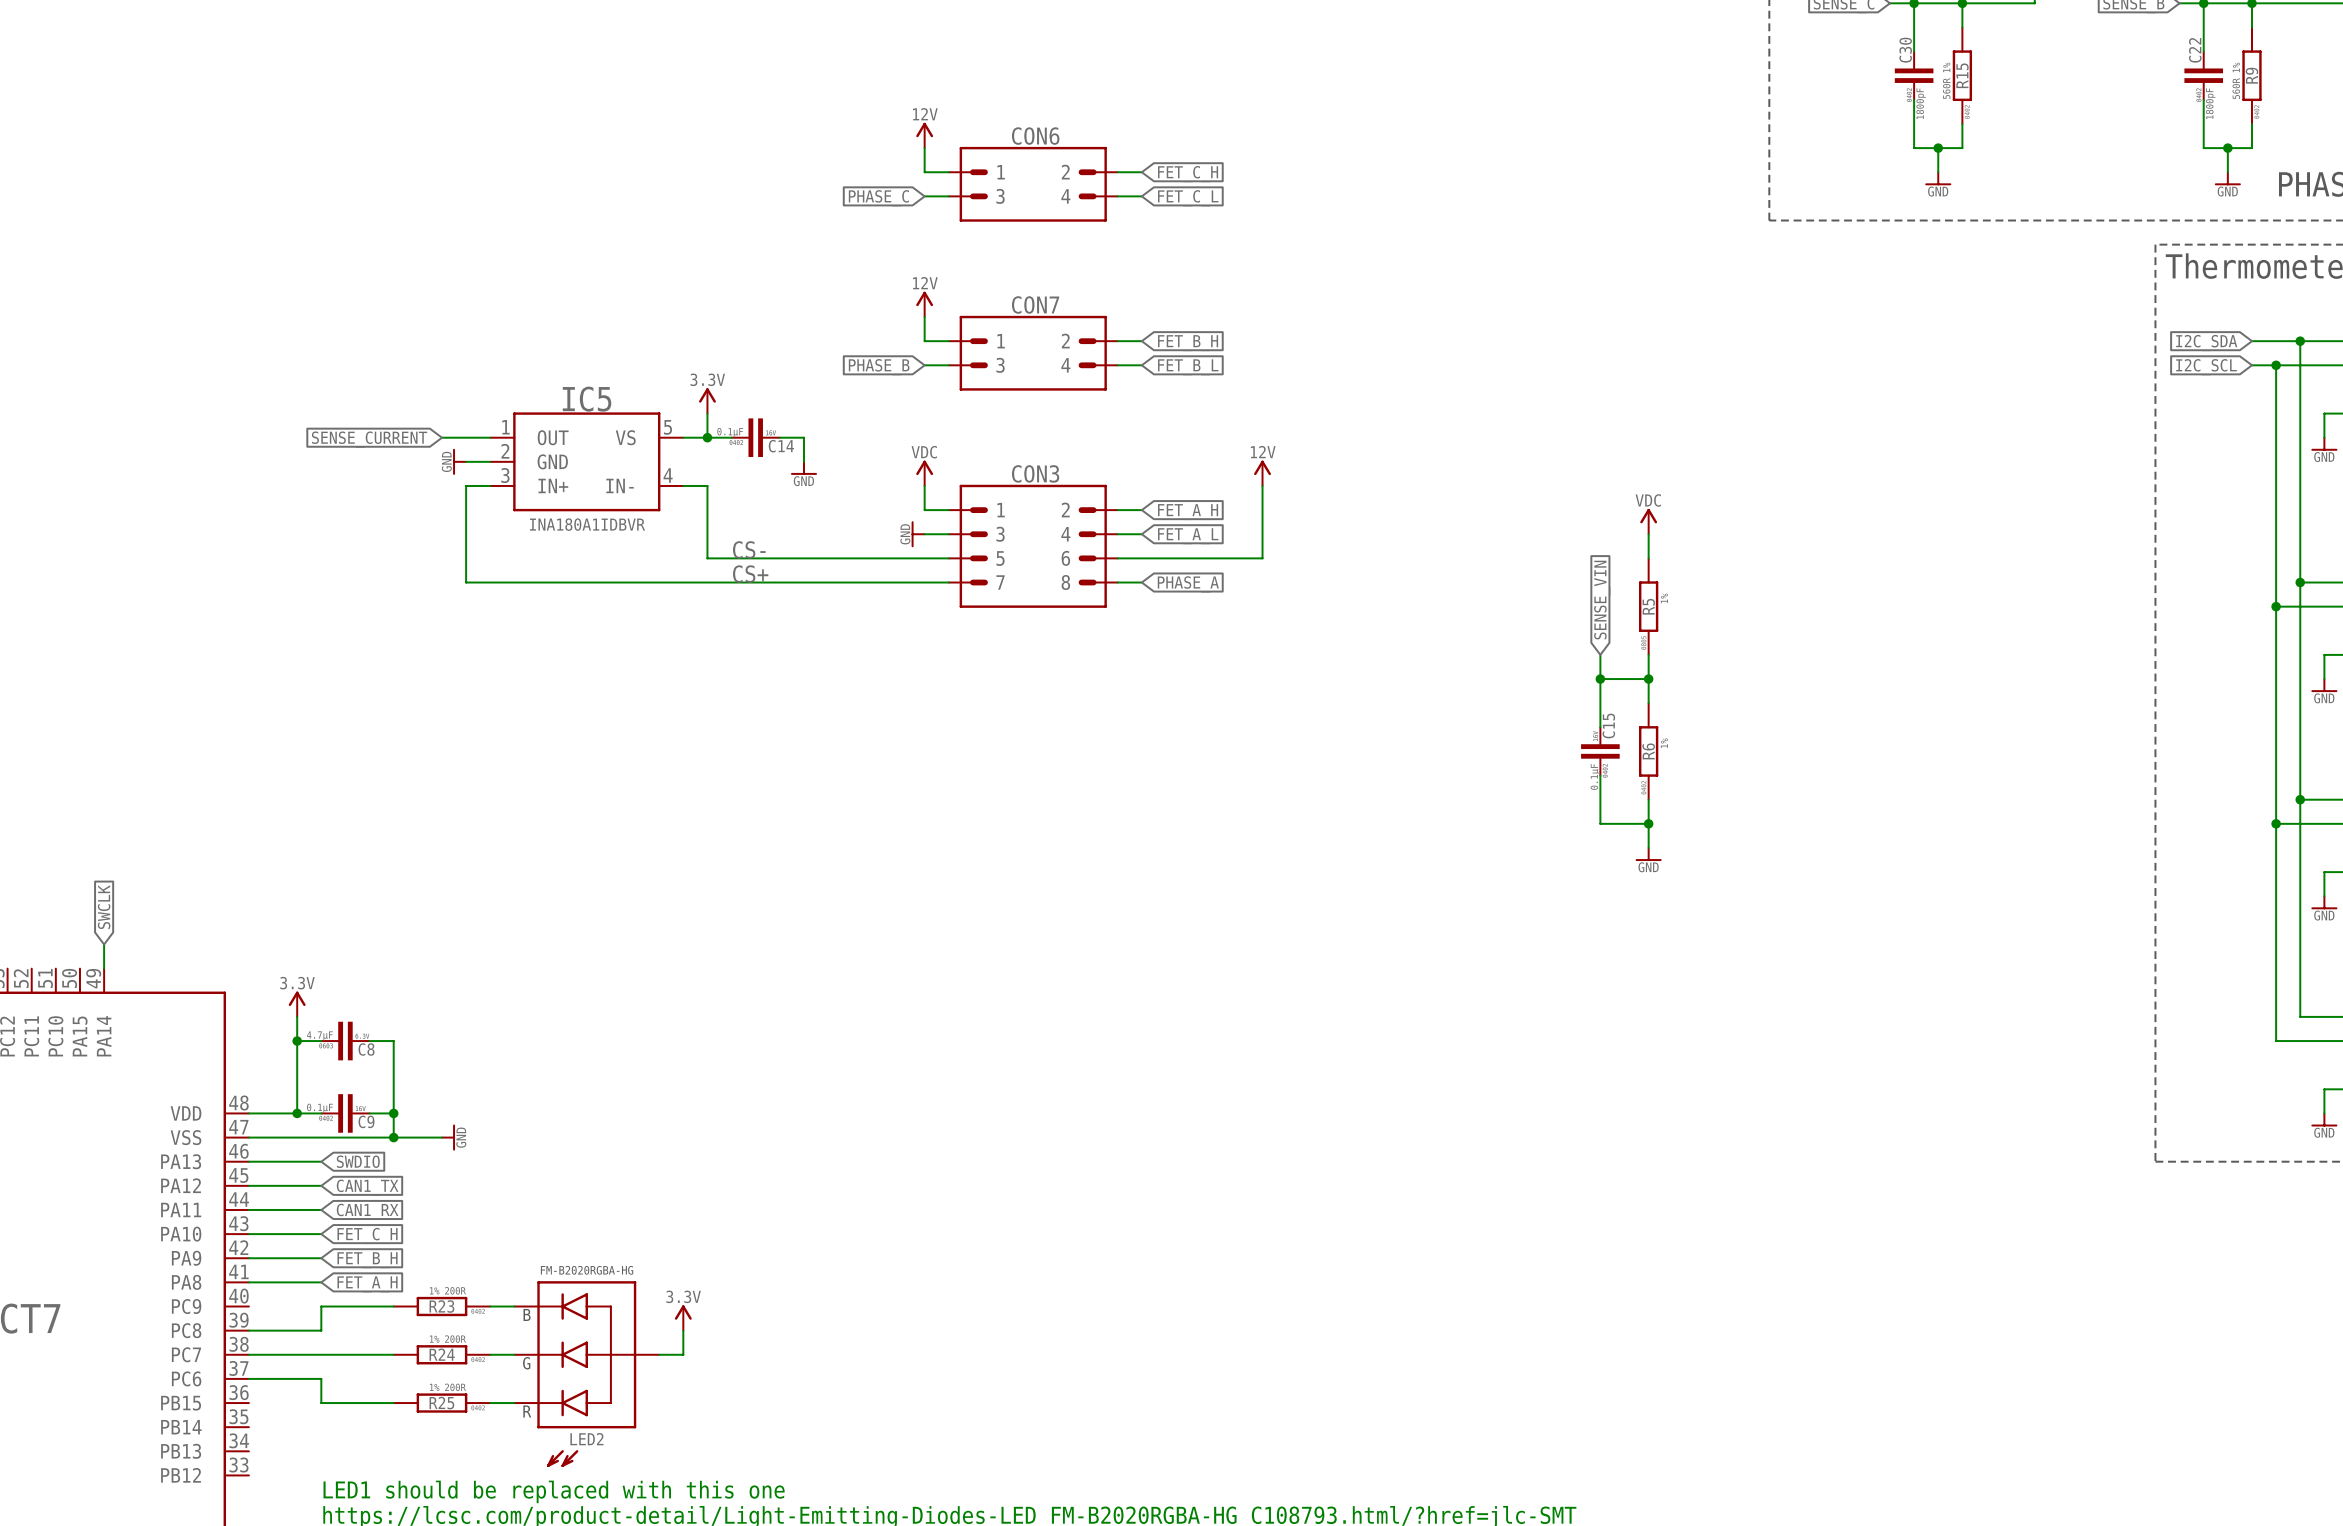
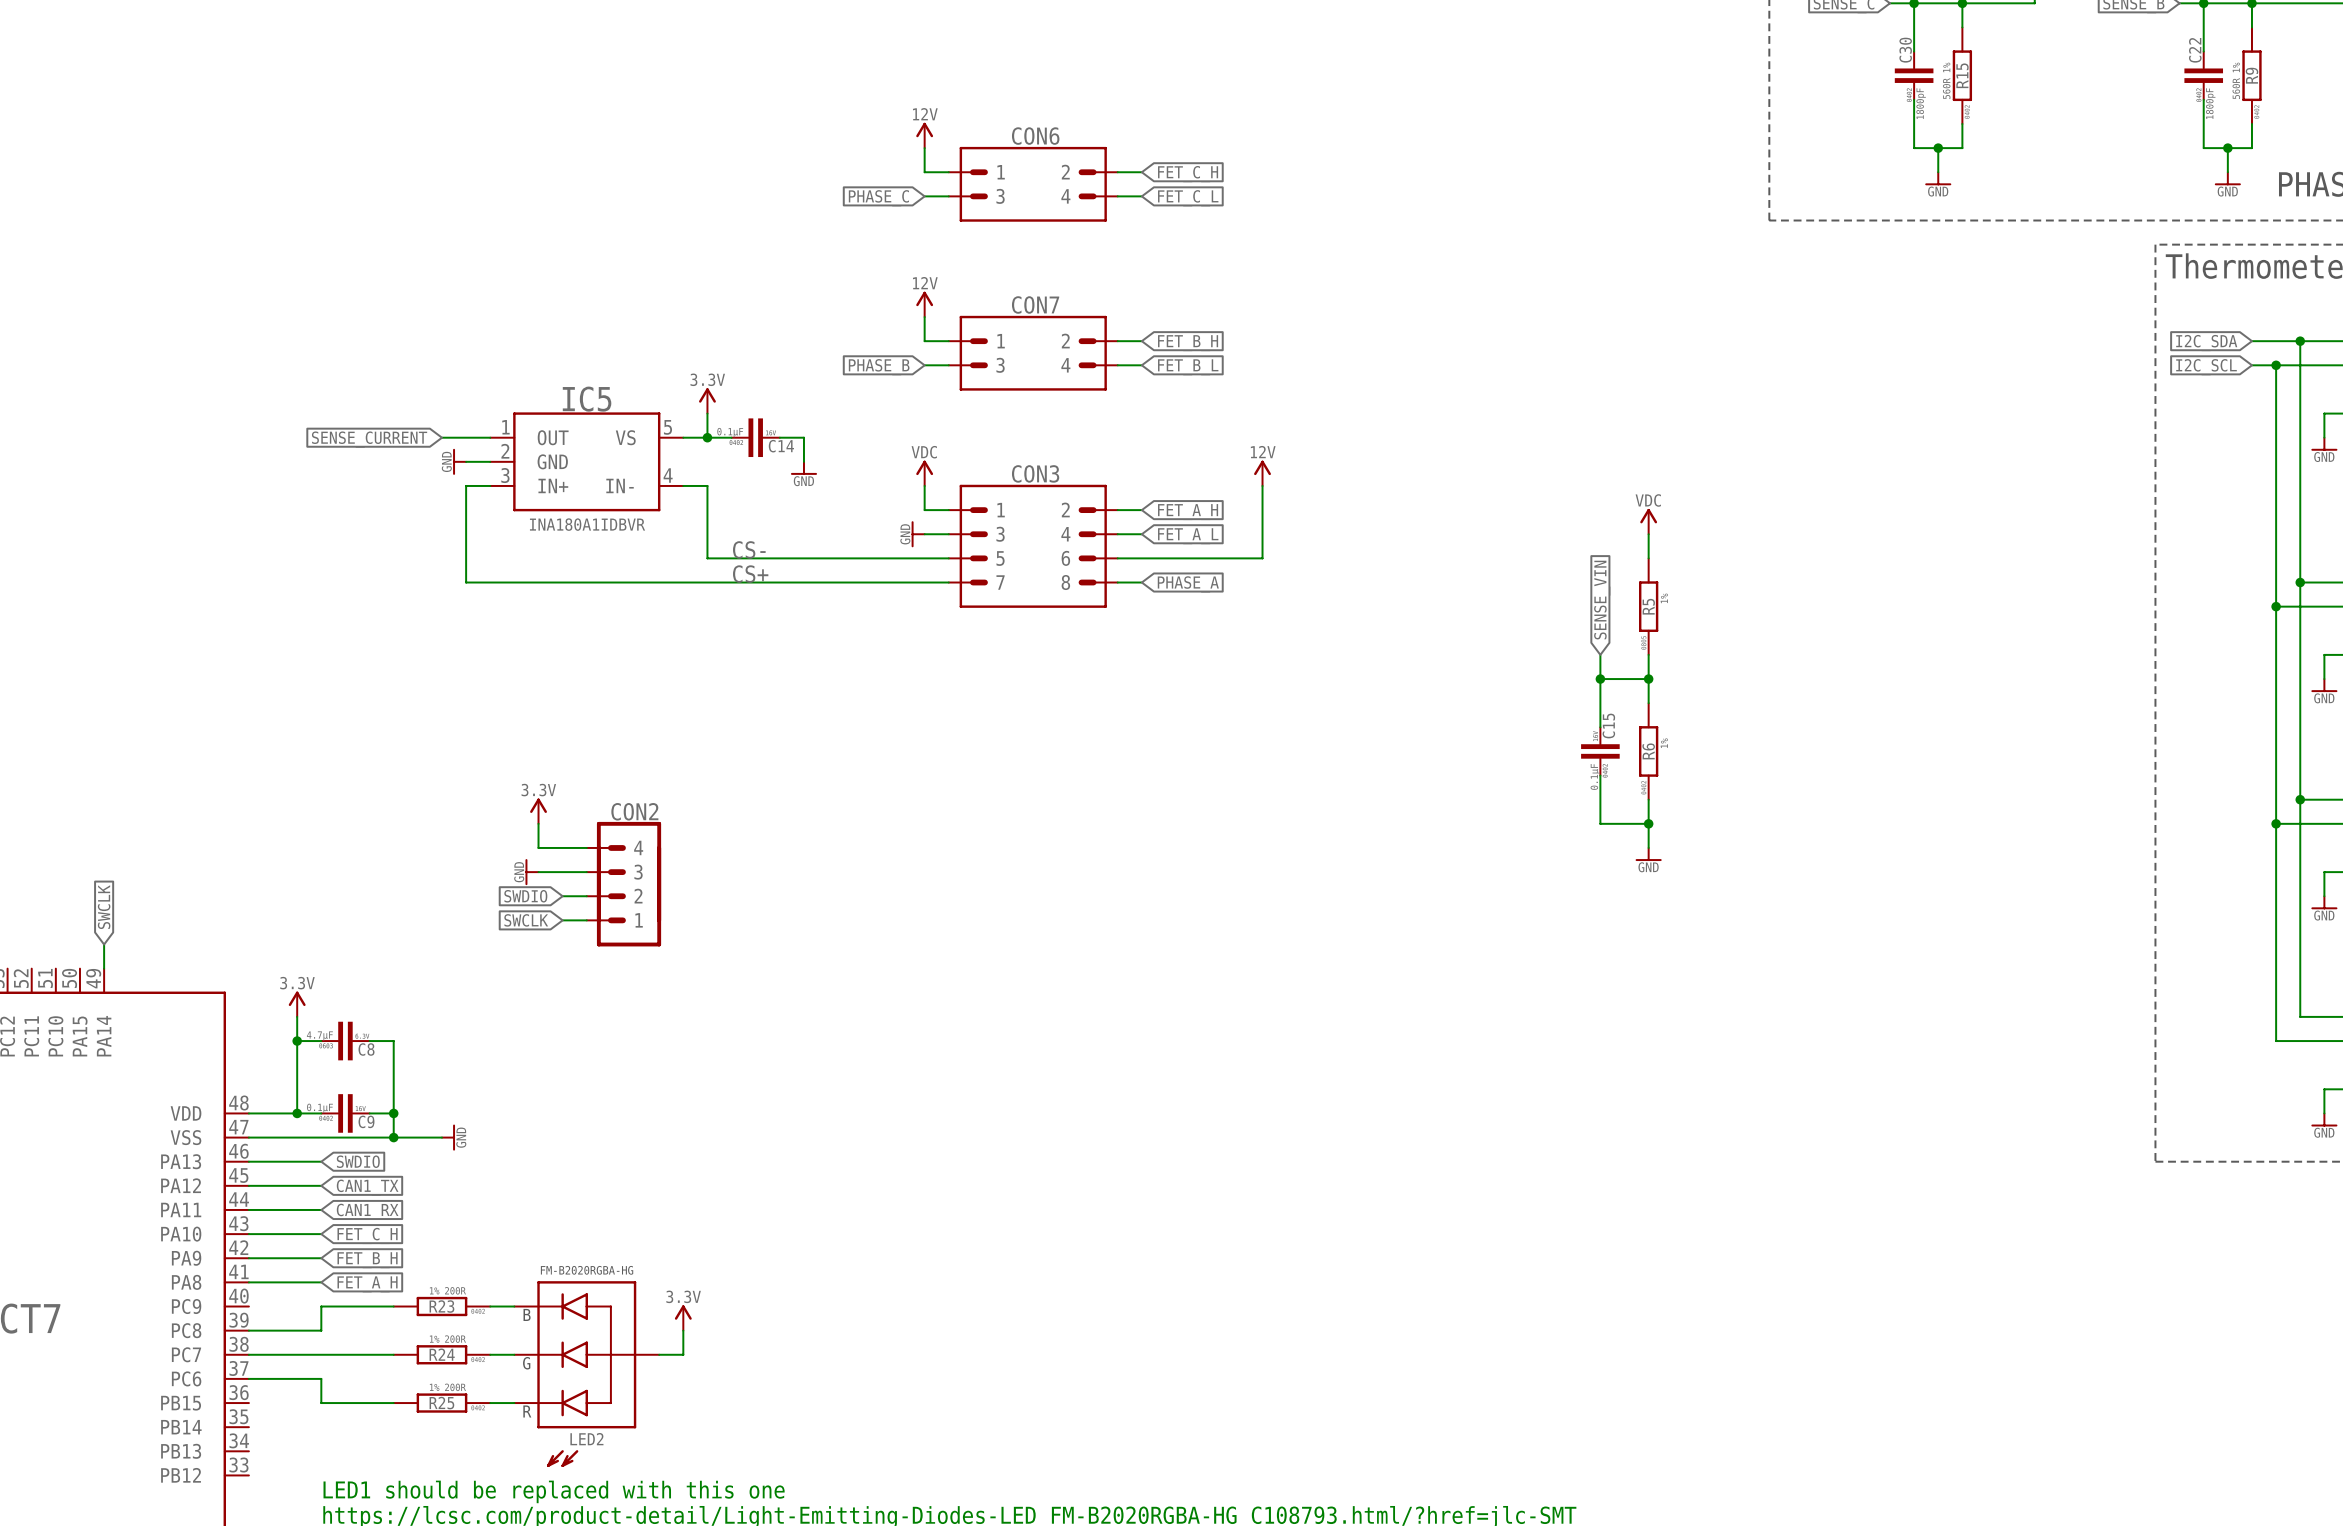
power symbol: none -> 3.3V (538, 811)
wire: none -> (538, 823) (538, 847) (586, 847)
power symbol: none -> GND (532, 872)
wire: none -> (538, 872) (586, 872)
CON2: none -> (623, 884)
global label: none -> SWDIO (525, 896)
wire: none -> (562, 896) (586, 896)
global label: none -> SWCLK (526, 920)
wire: none -> (562, 920) (586, 920)

